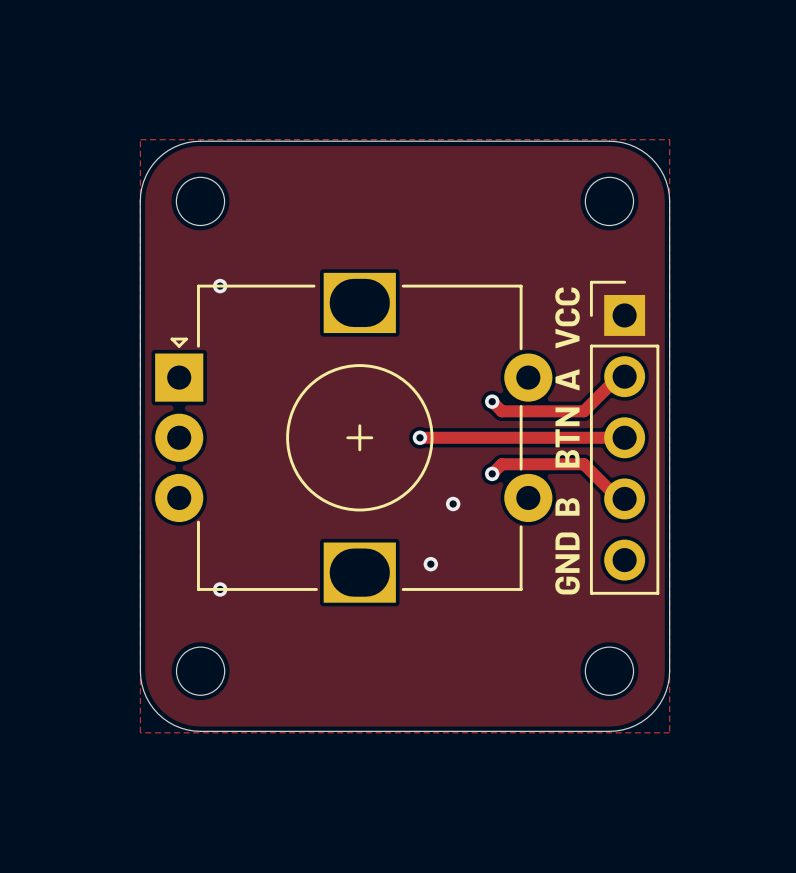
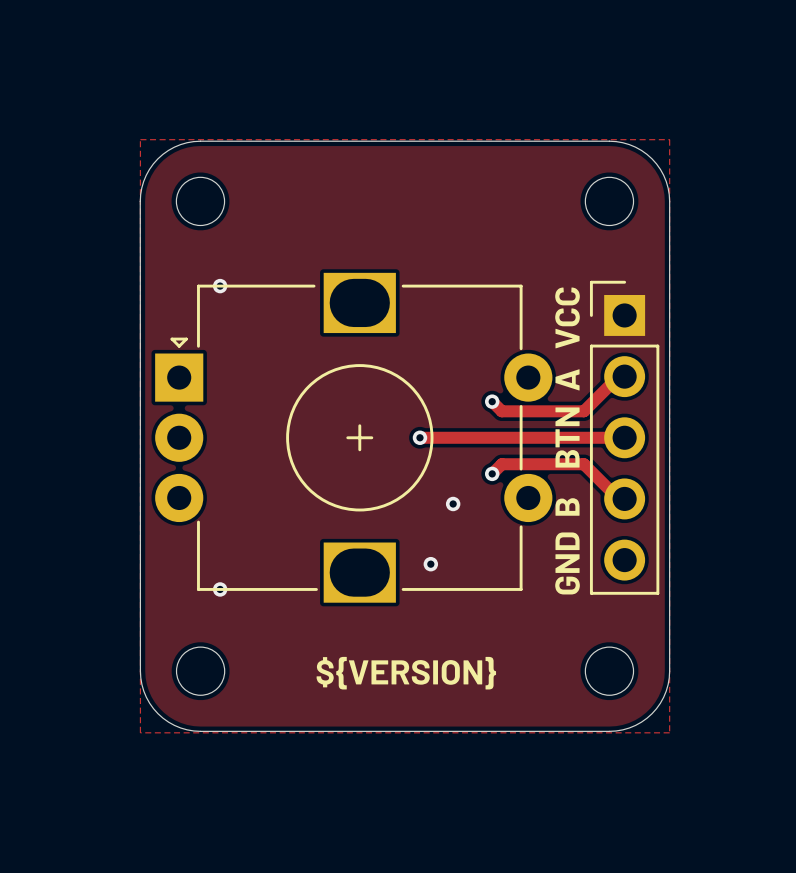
text: none -> ${VERSION} (406, 673)

